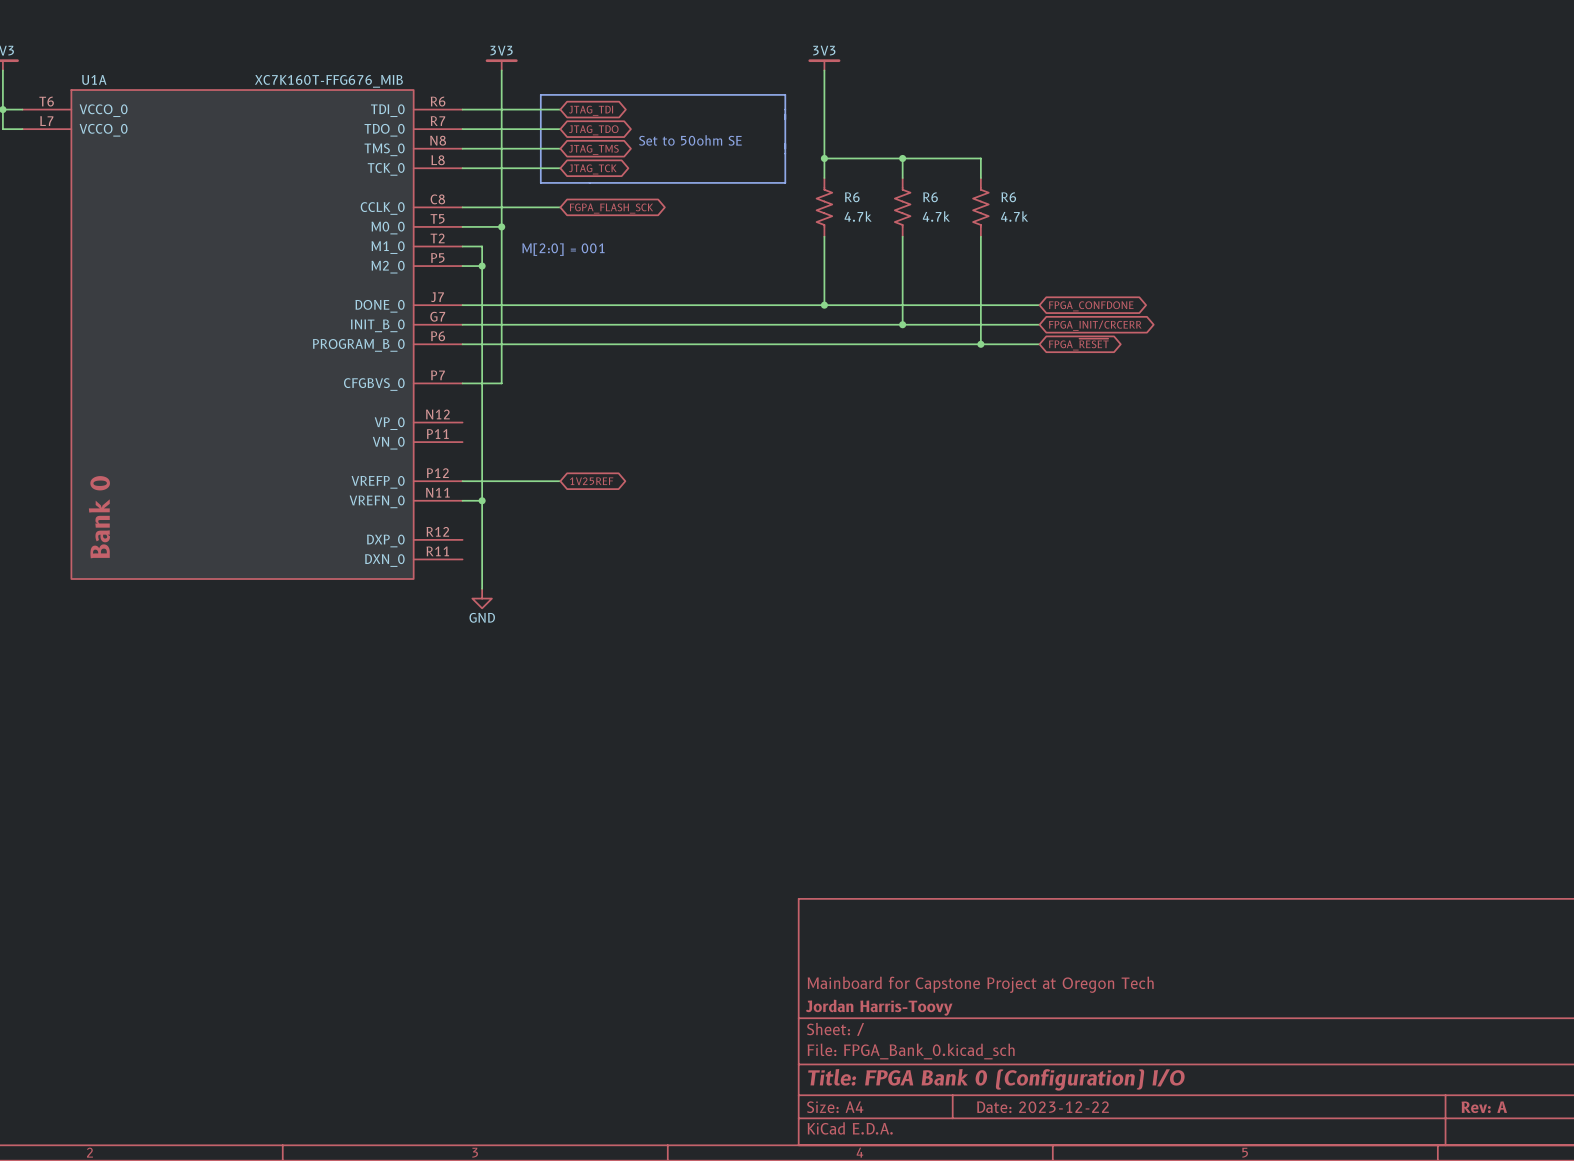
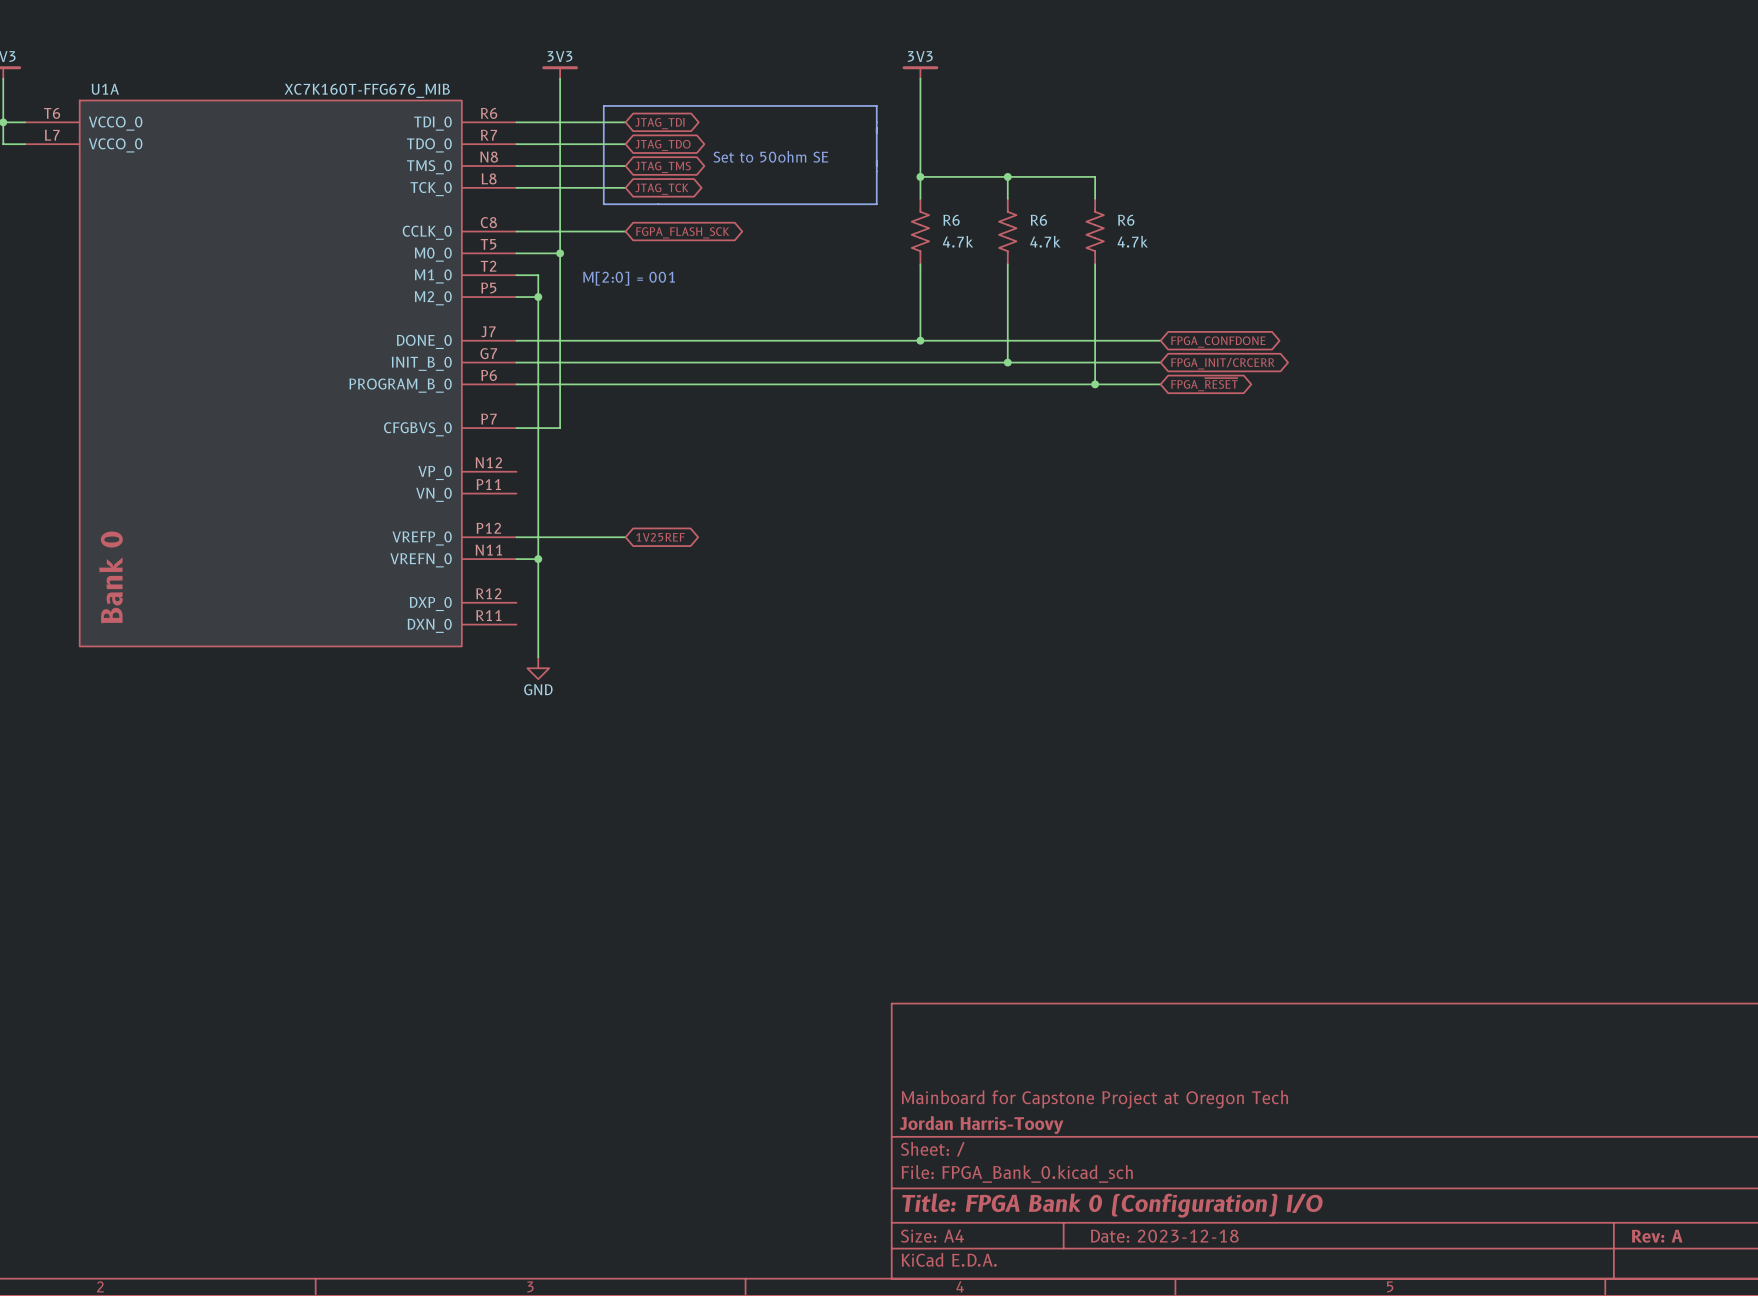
title block: Date: 2023-12-22 (1042, 1107) -> Date: 2023-12-18 (1164, 1236)

